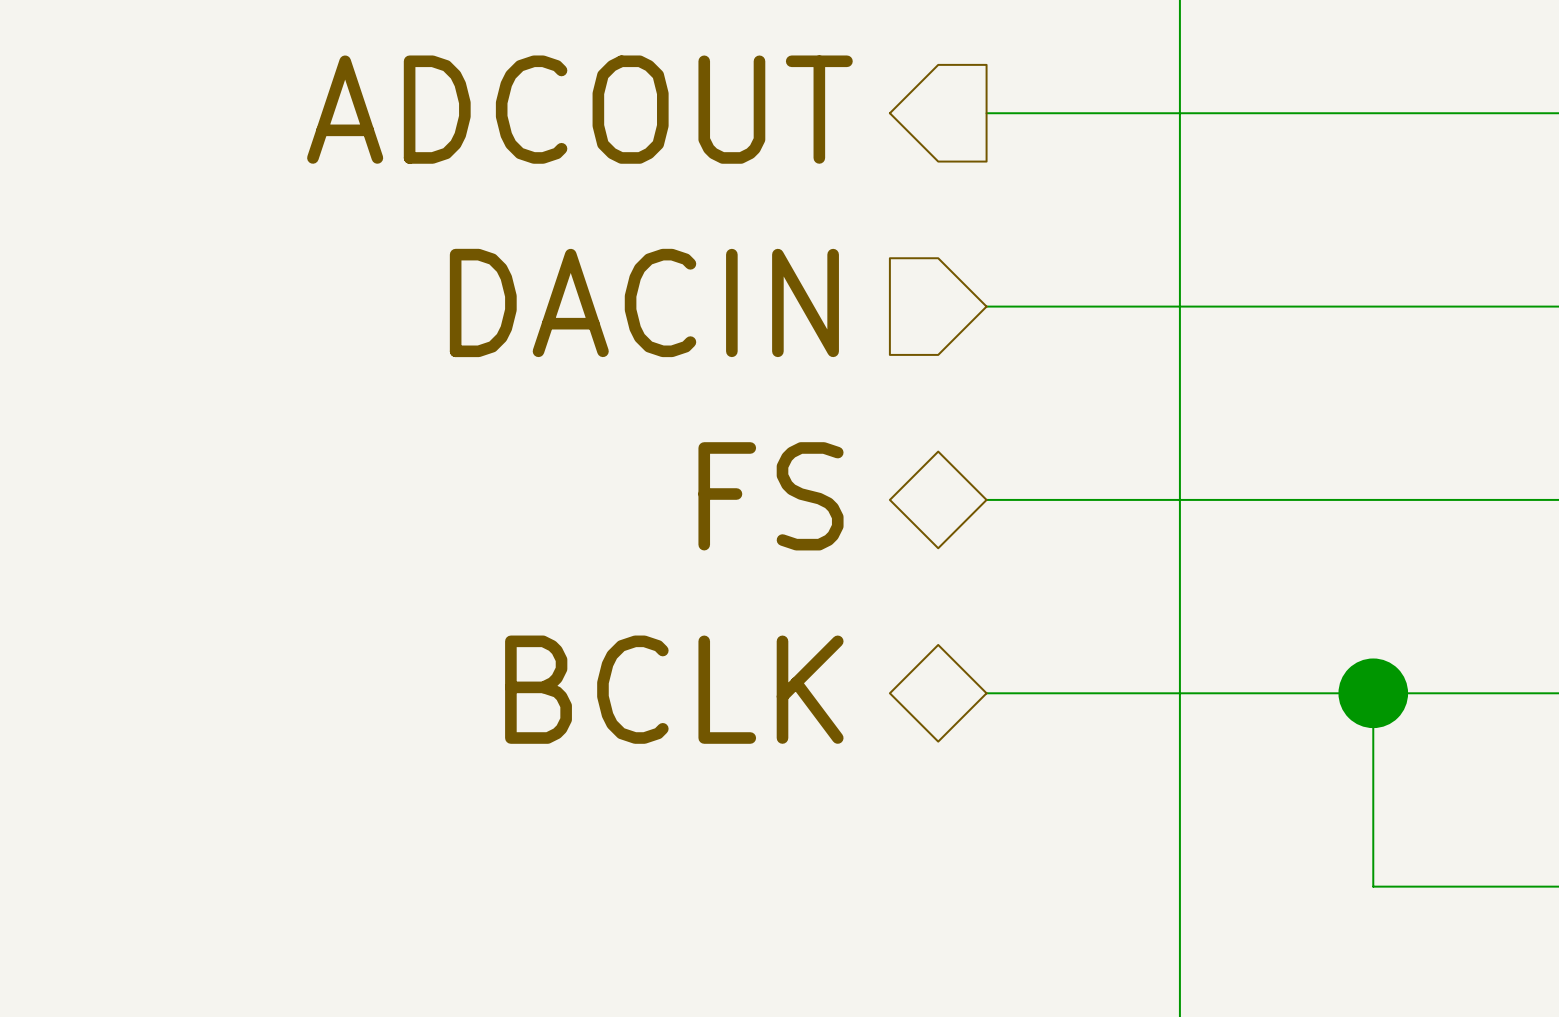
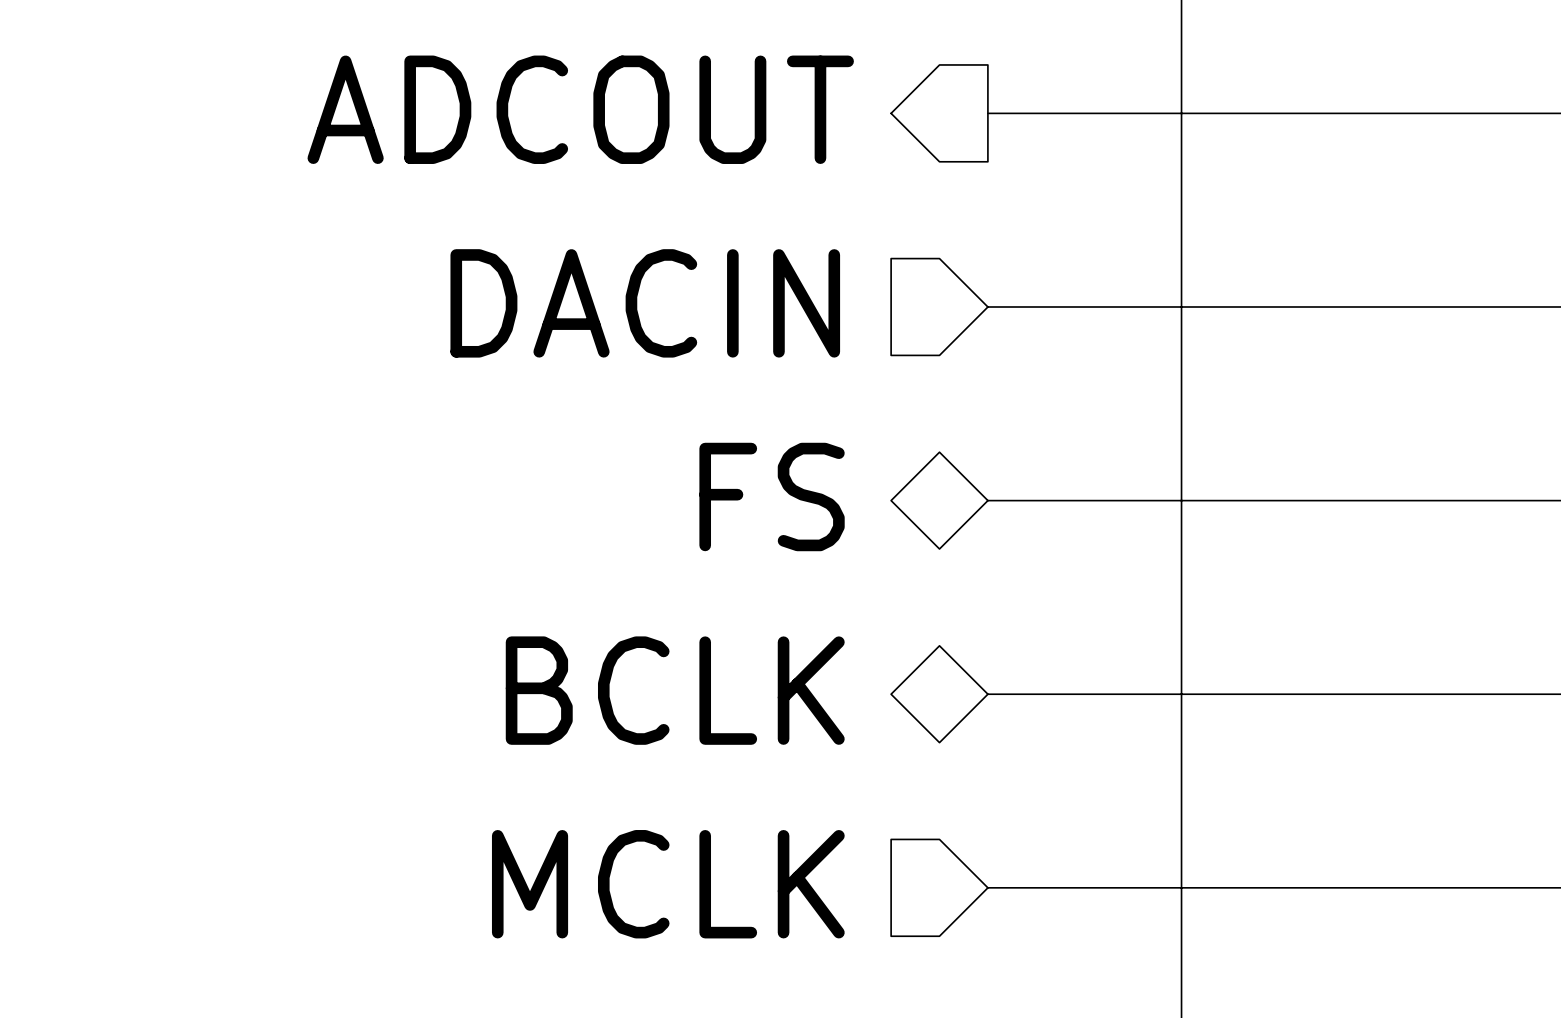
wire: (1373, 693) (1373, 886) -> (987, 887) (1375, 887)
junction: (1373, 693) -> none
hierarchical label: none -> MCLK (668, 884)

